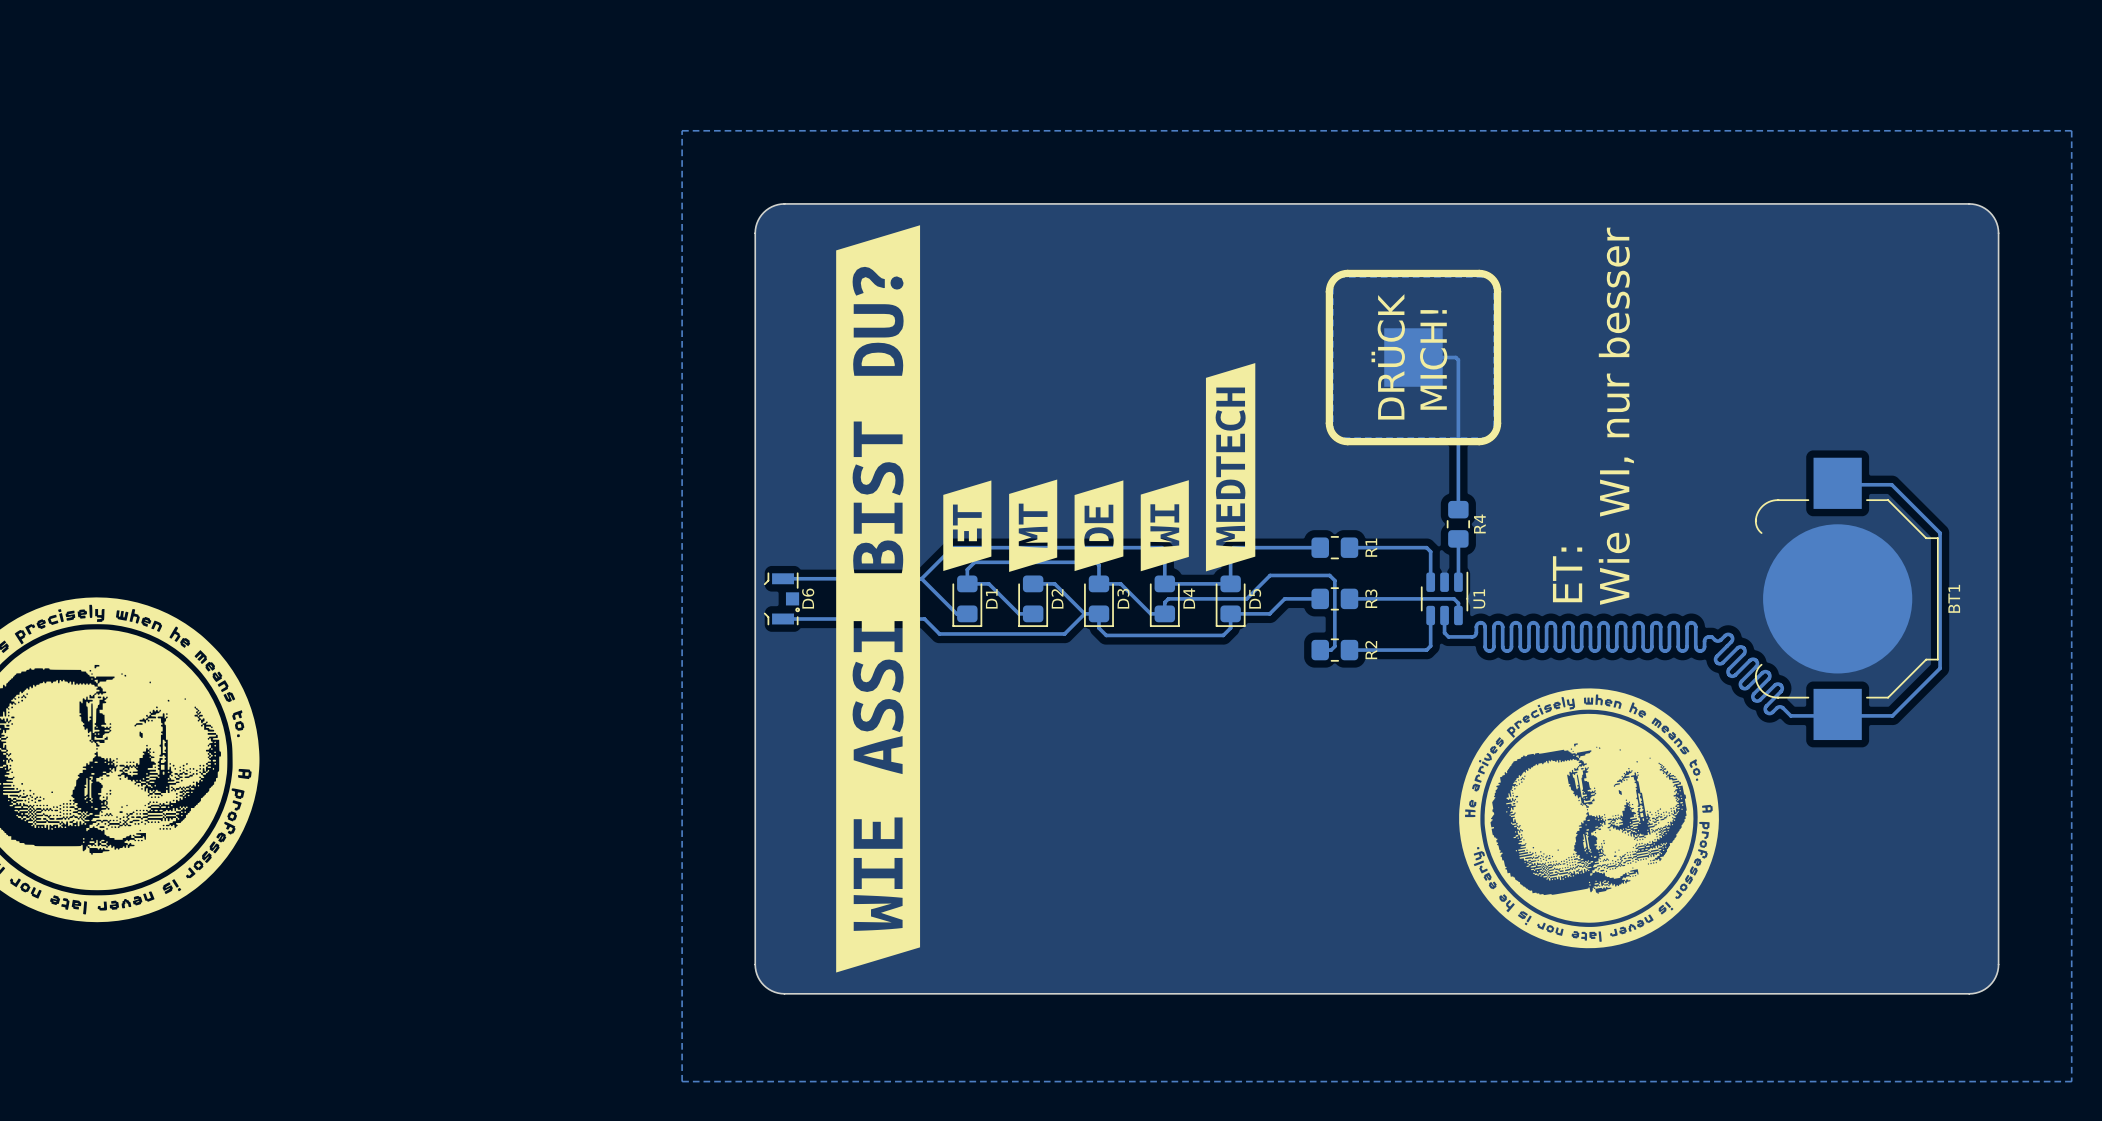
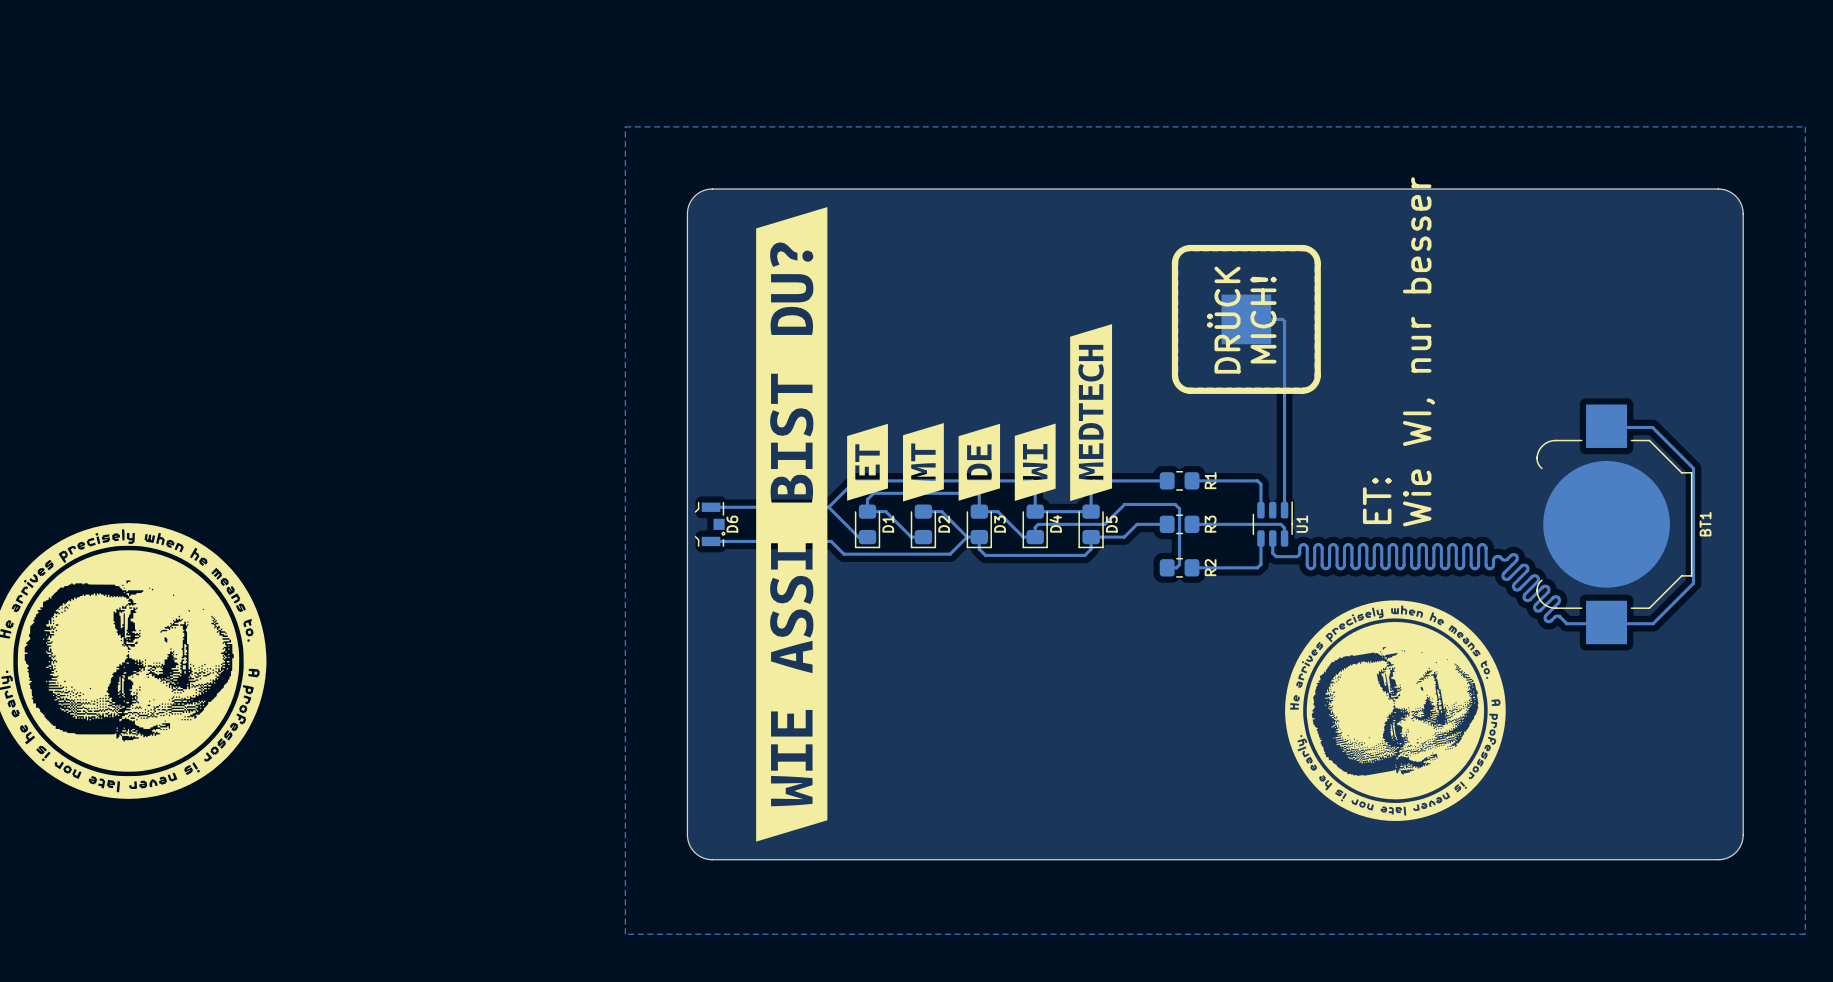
R4: (1458, 524) -> none

